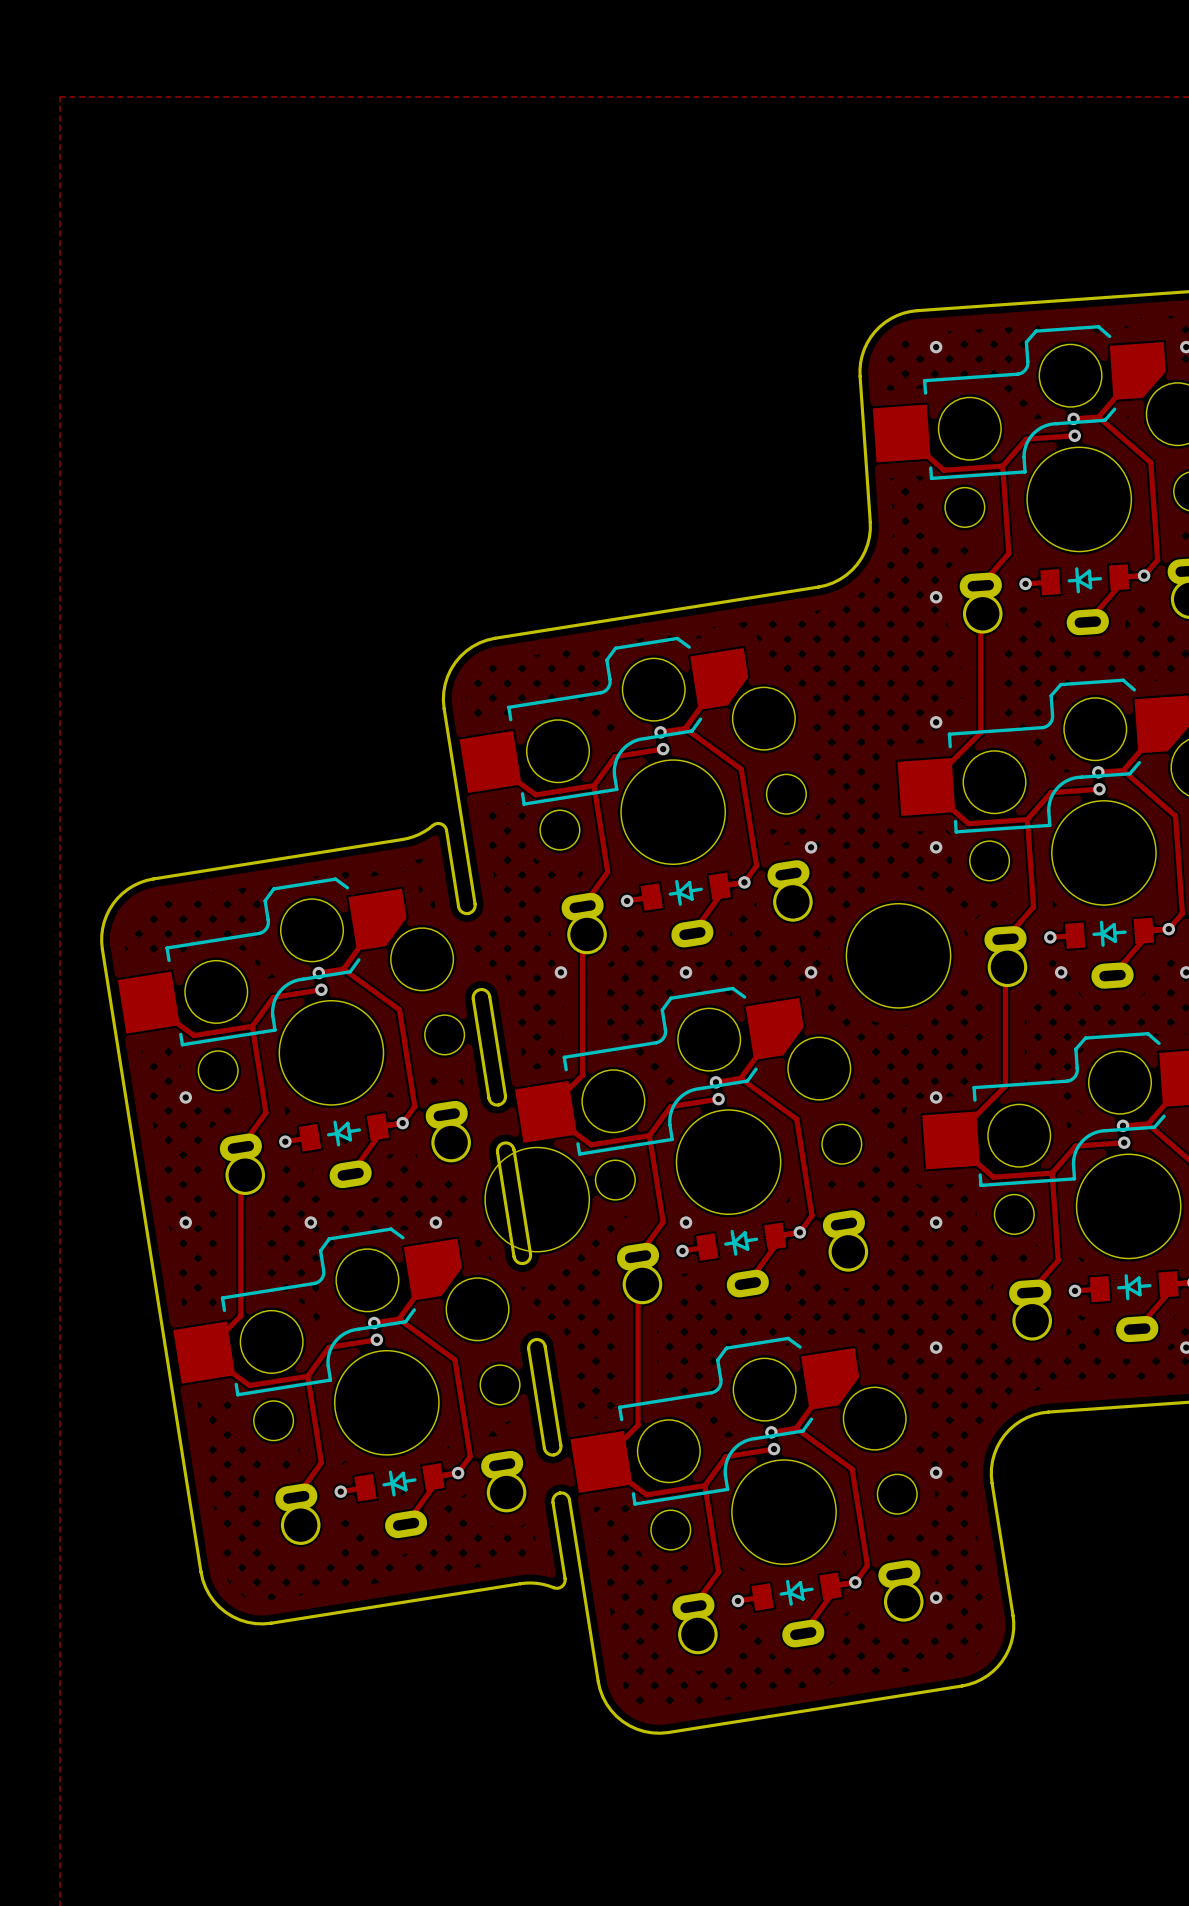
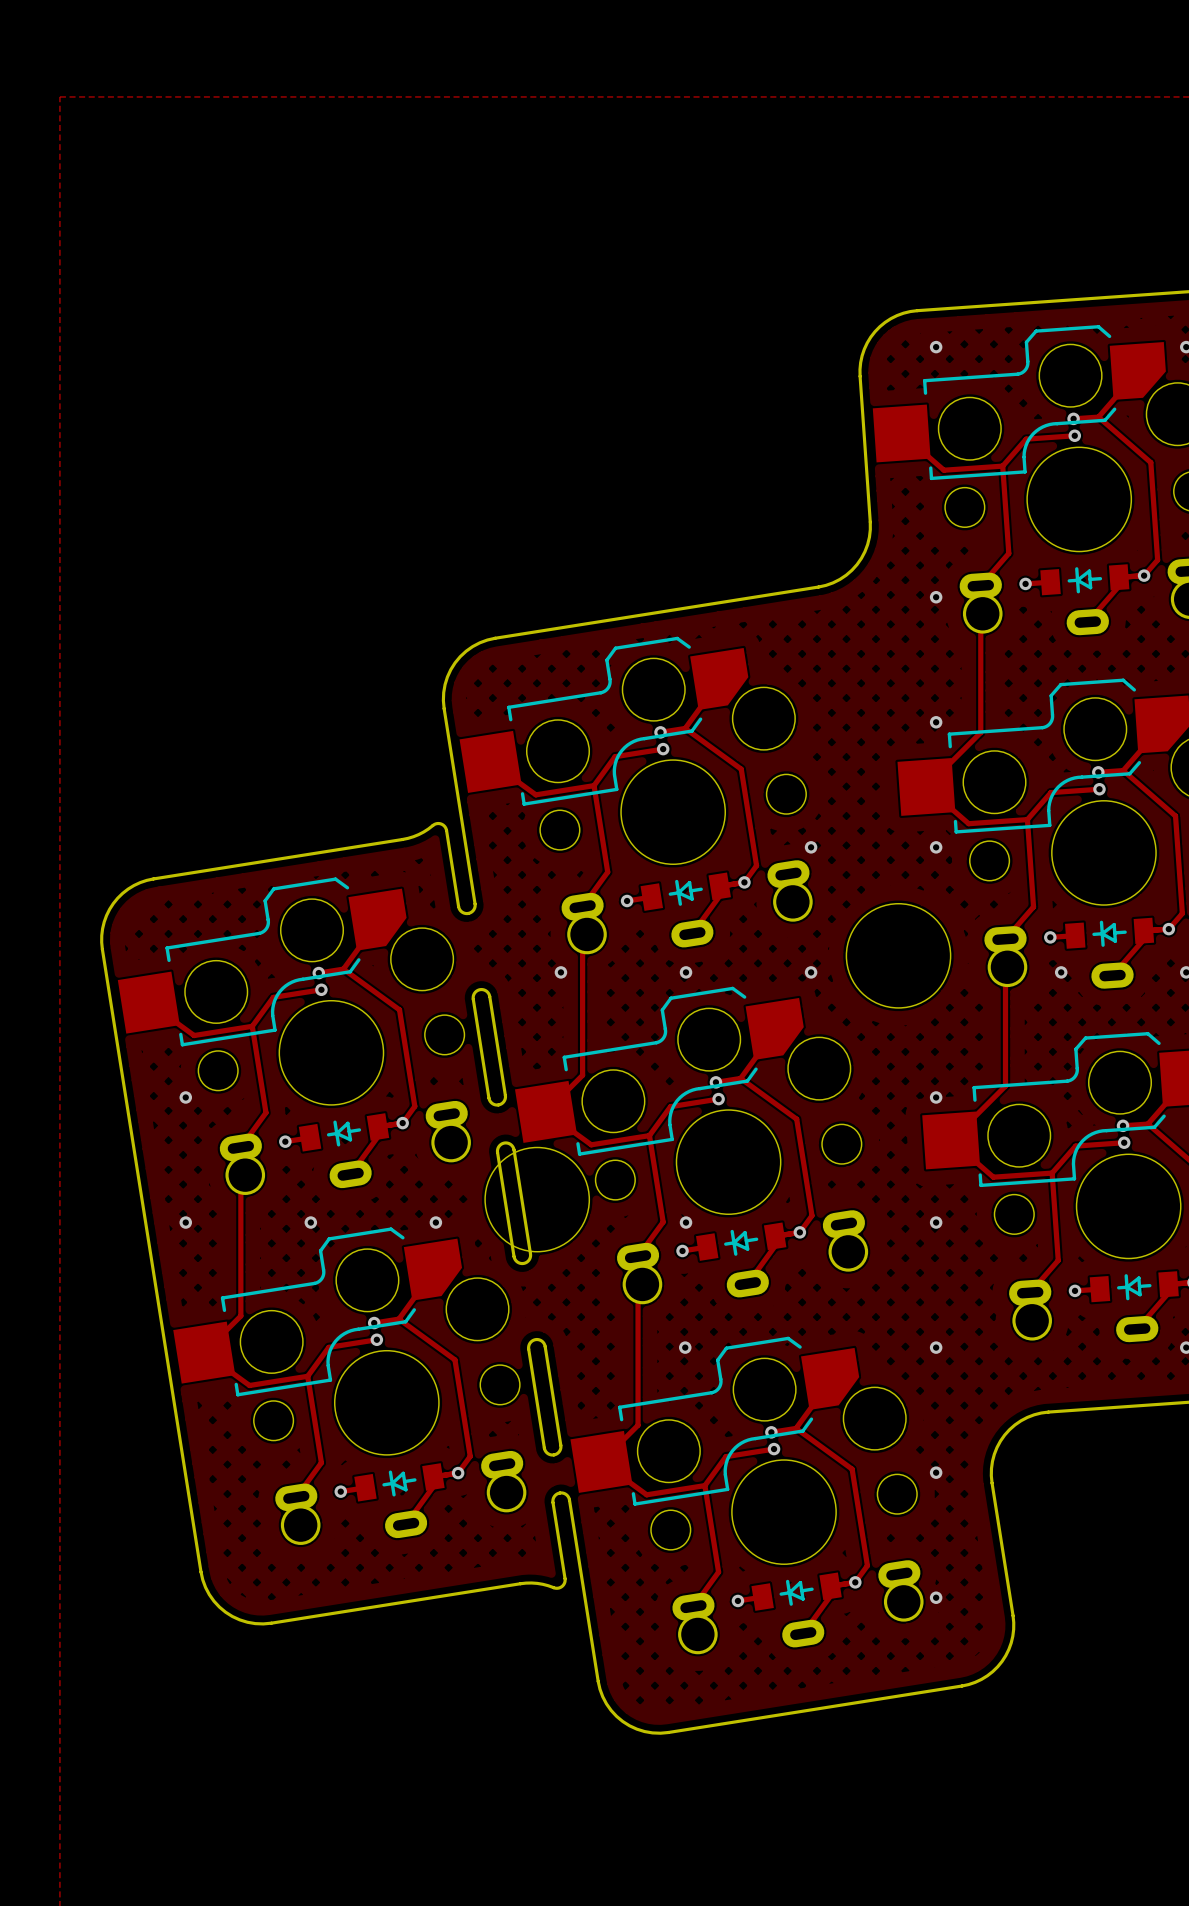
via: none -> (685, 1347)

